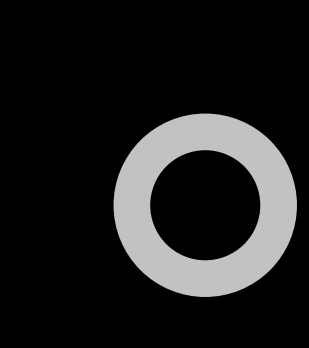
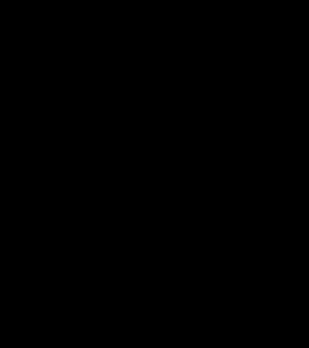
via: (205, 205) -> none

